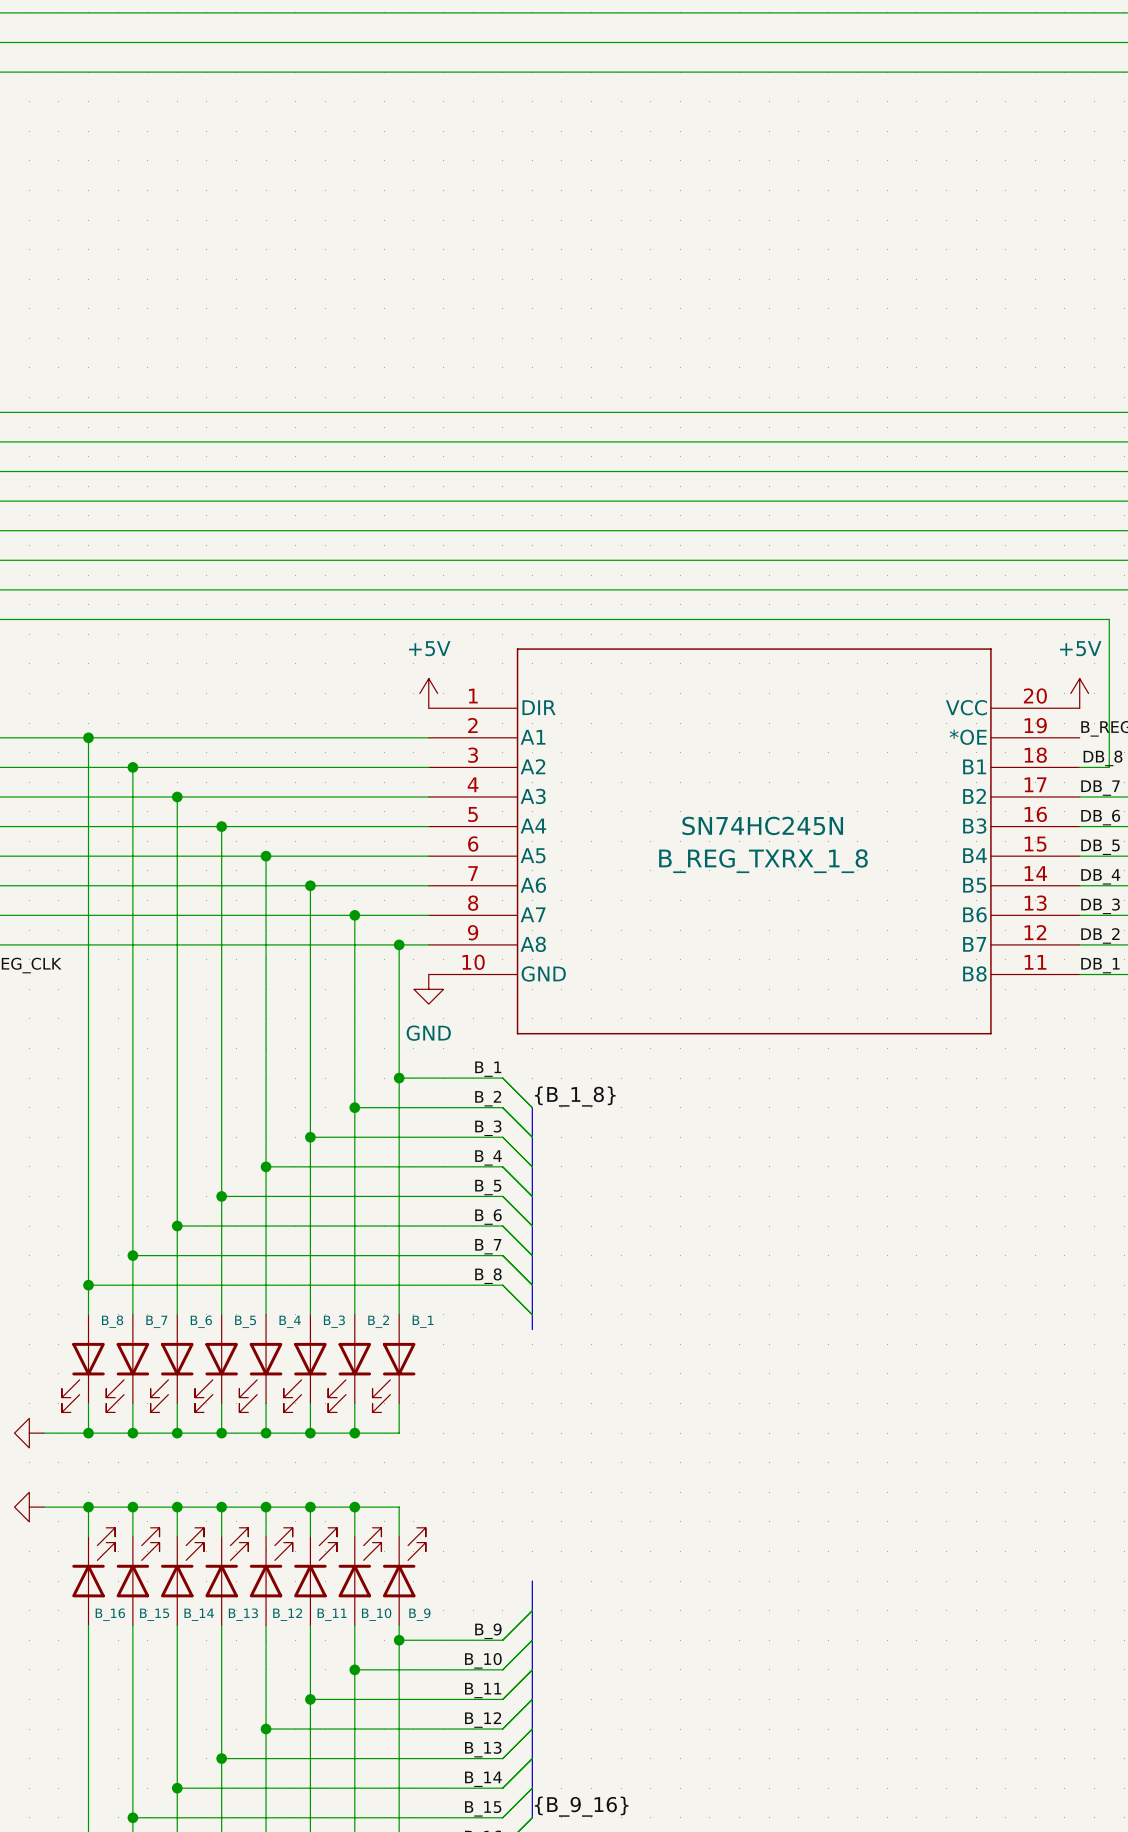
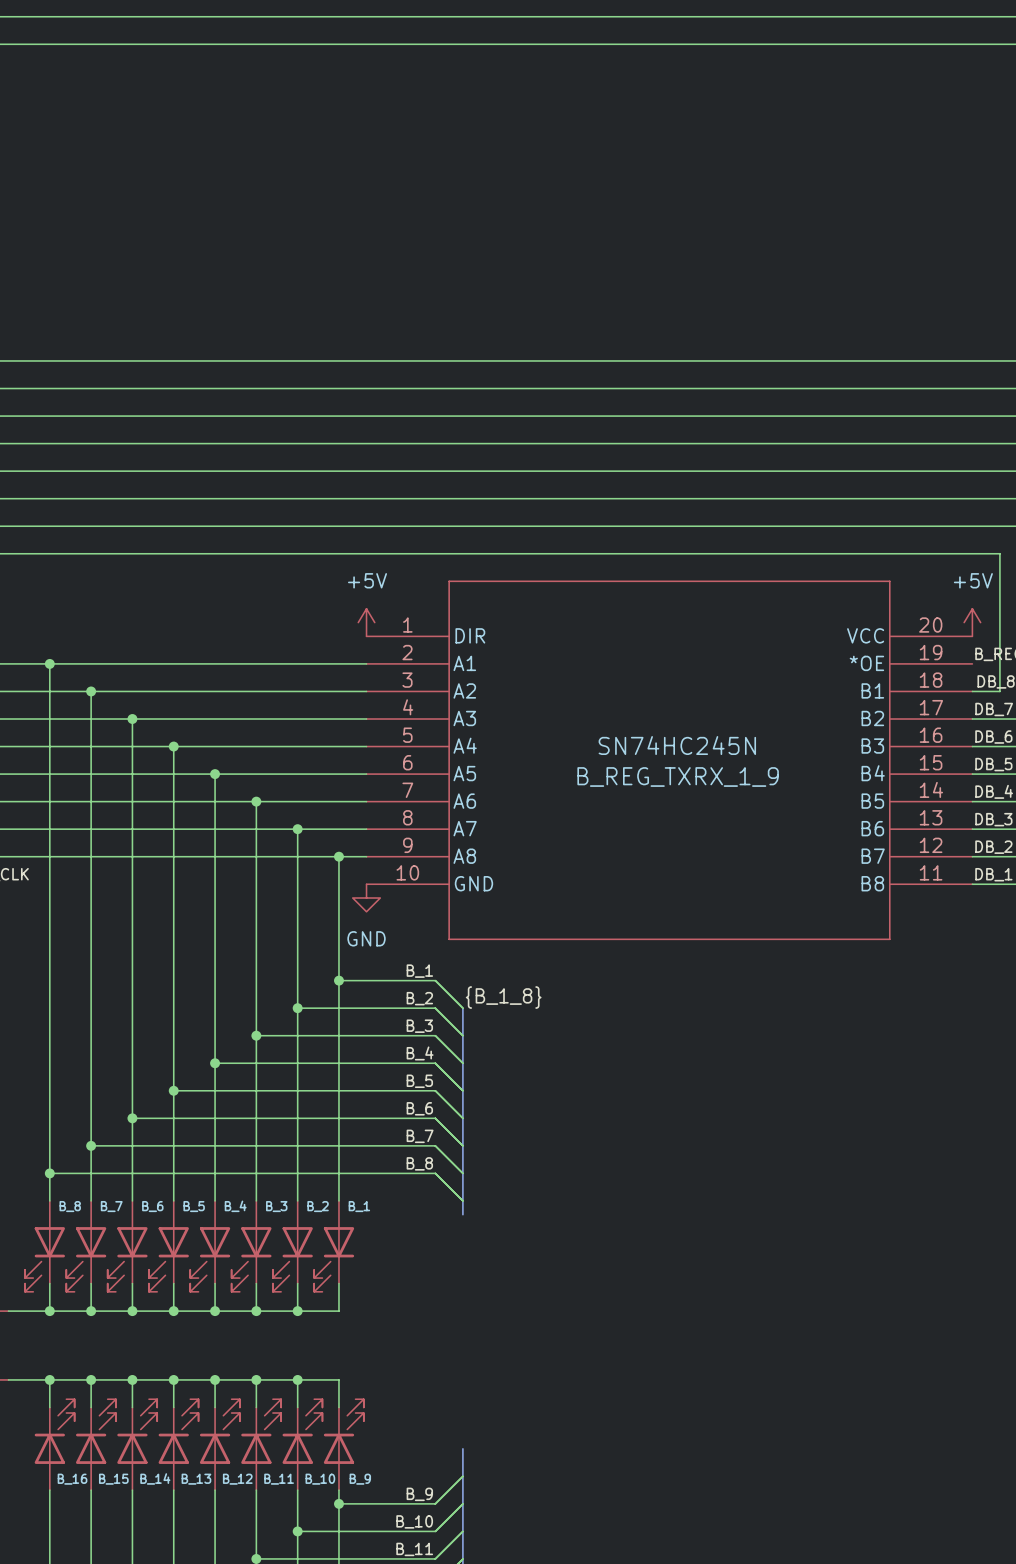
B_REG_TXRX_1_8 name: B_REG_TXRX_1_8 (763, 861) -> B_REG_TXRX_1_9 (678, 777)

